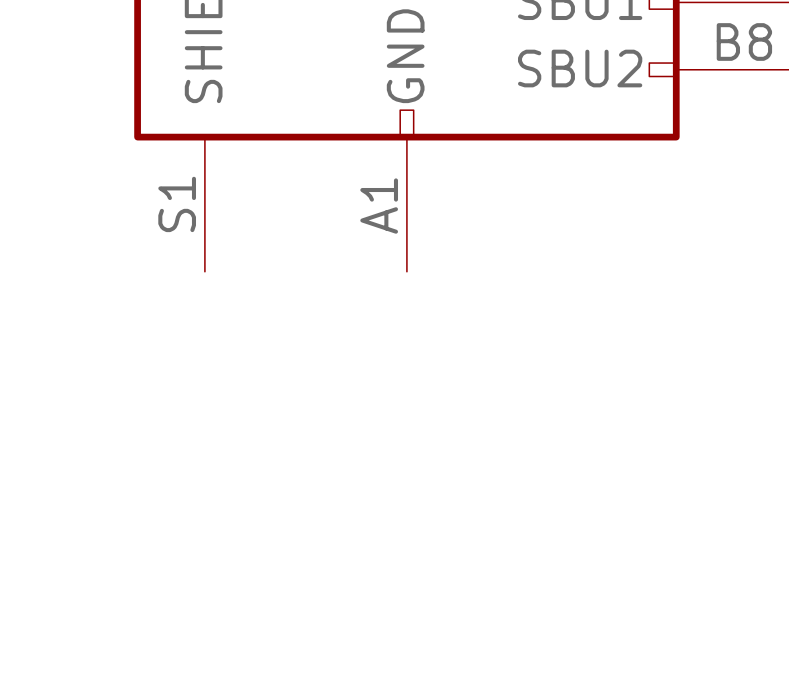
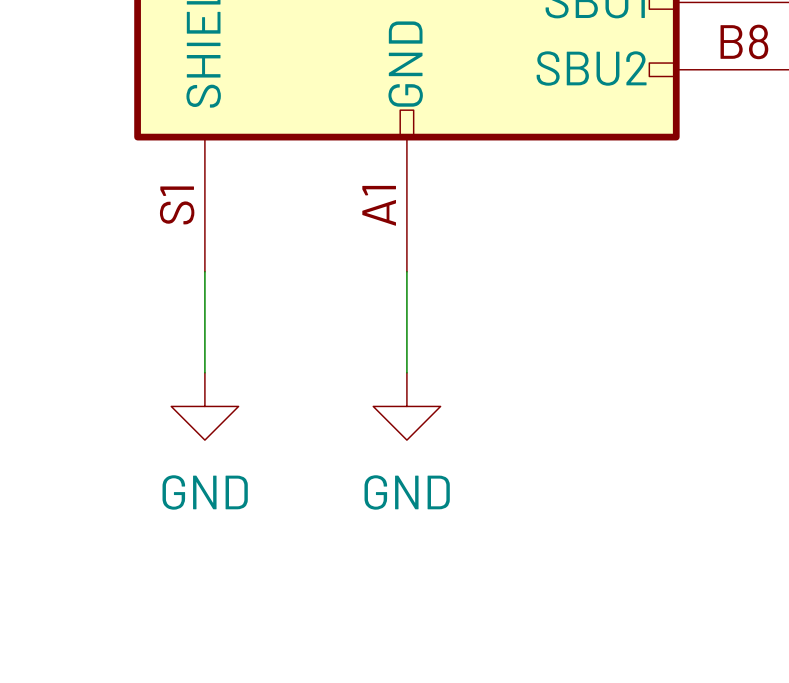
wire: none -> (204, 271) (204, 372)
wire: none -> (406, 271) (406, 372)
power symbol: none -> GND (204, 406)
power symbol: none -> GND (406, 406)

